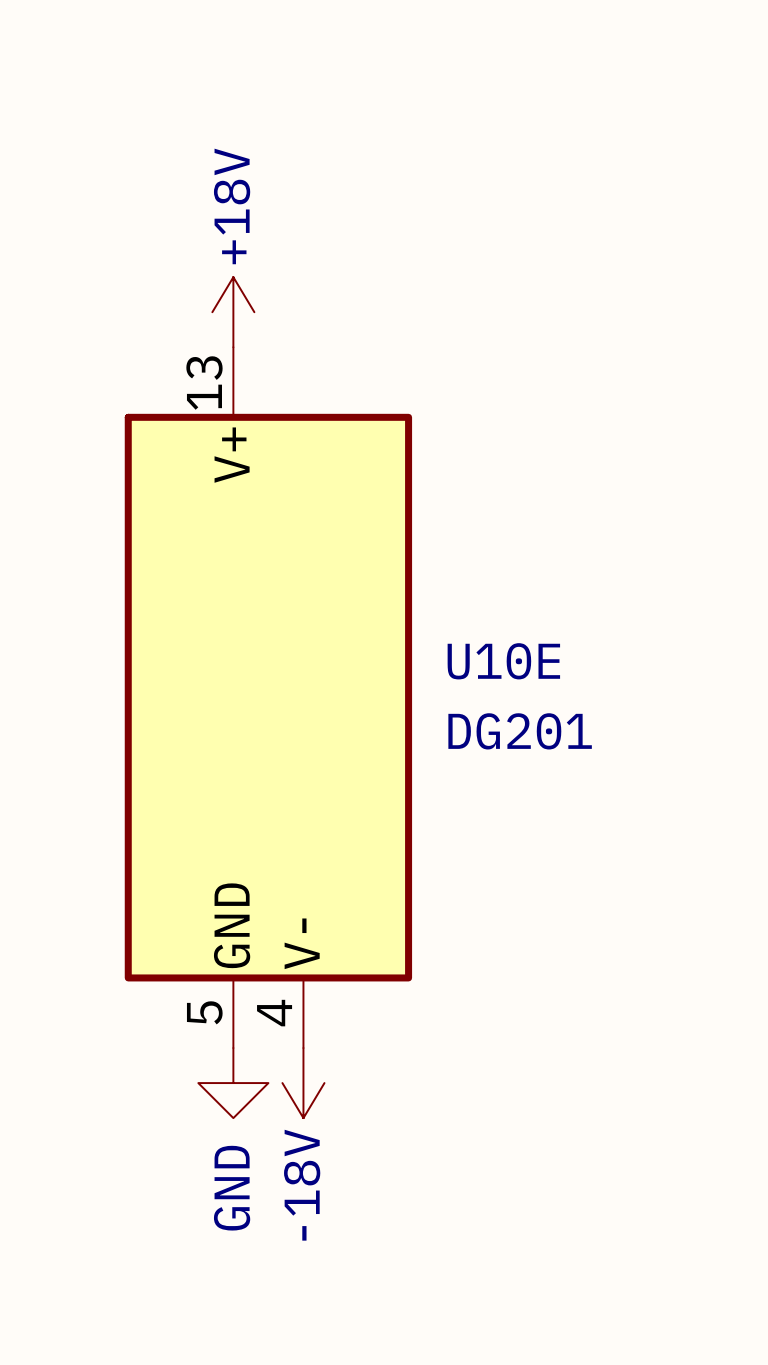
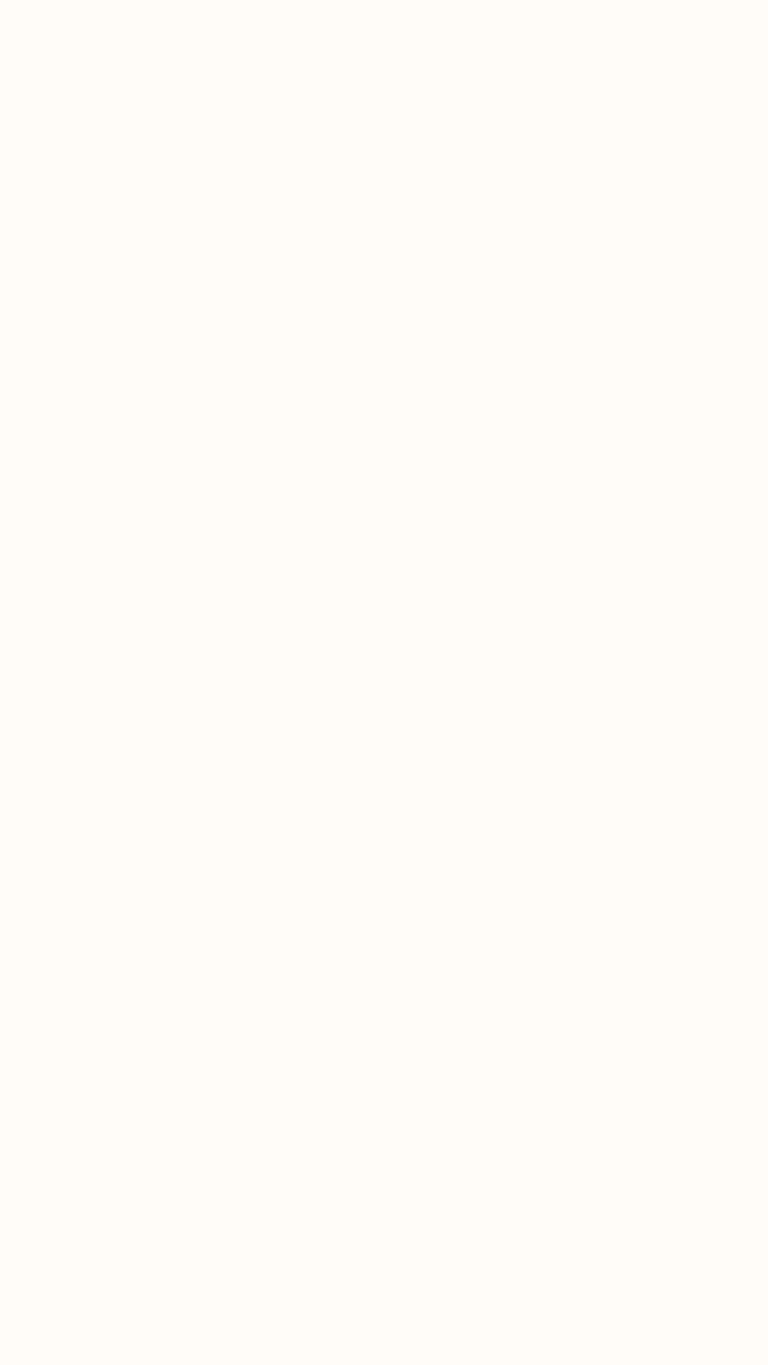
power symbol: +18V (233, 312) -> none
U10E: DG201 (268, 697) -> none
power symbol: GND (233, 1083) -> none
power symbol: -18V (303, 1083) -> none

